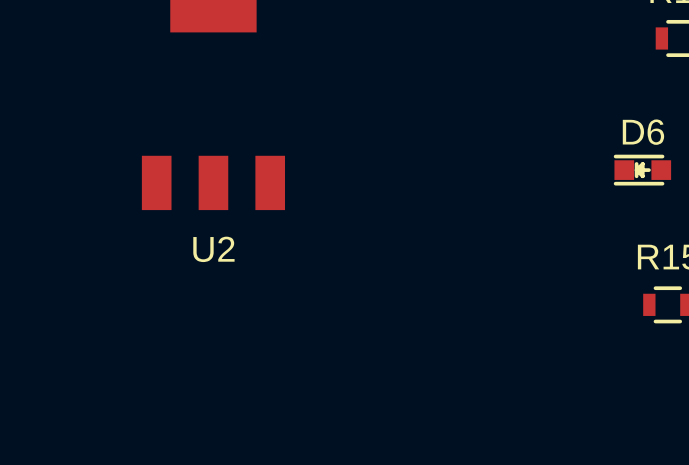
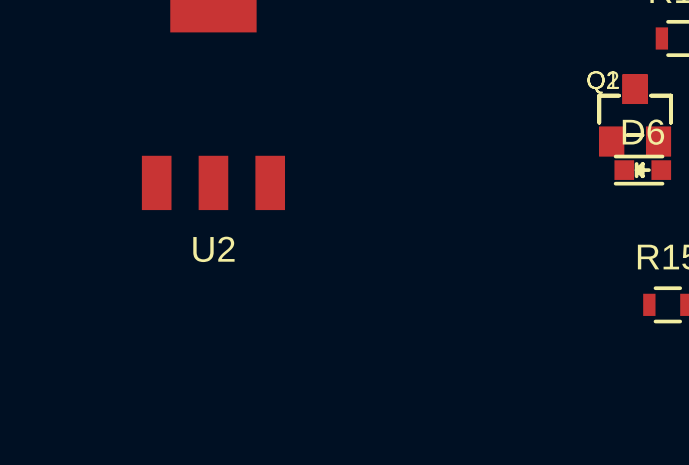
part: none -> (635, 115)
part: none -> (635, 115)

